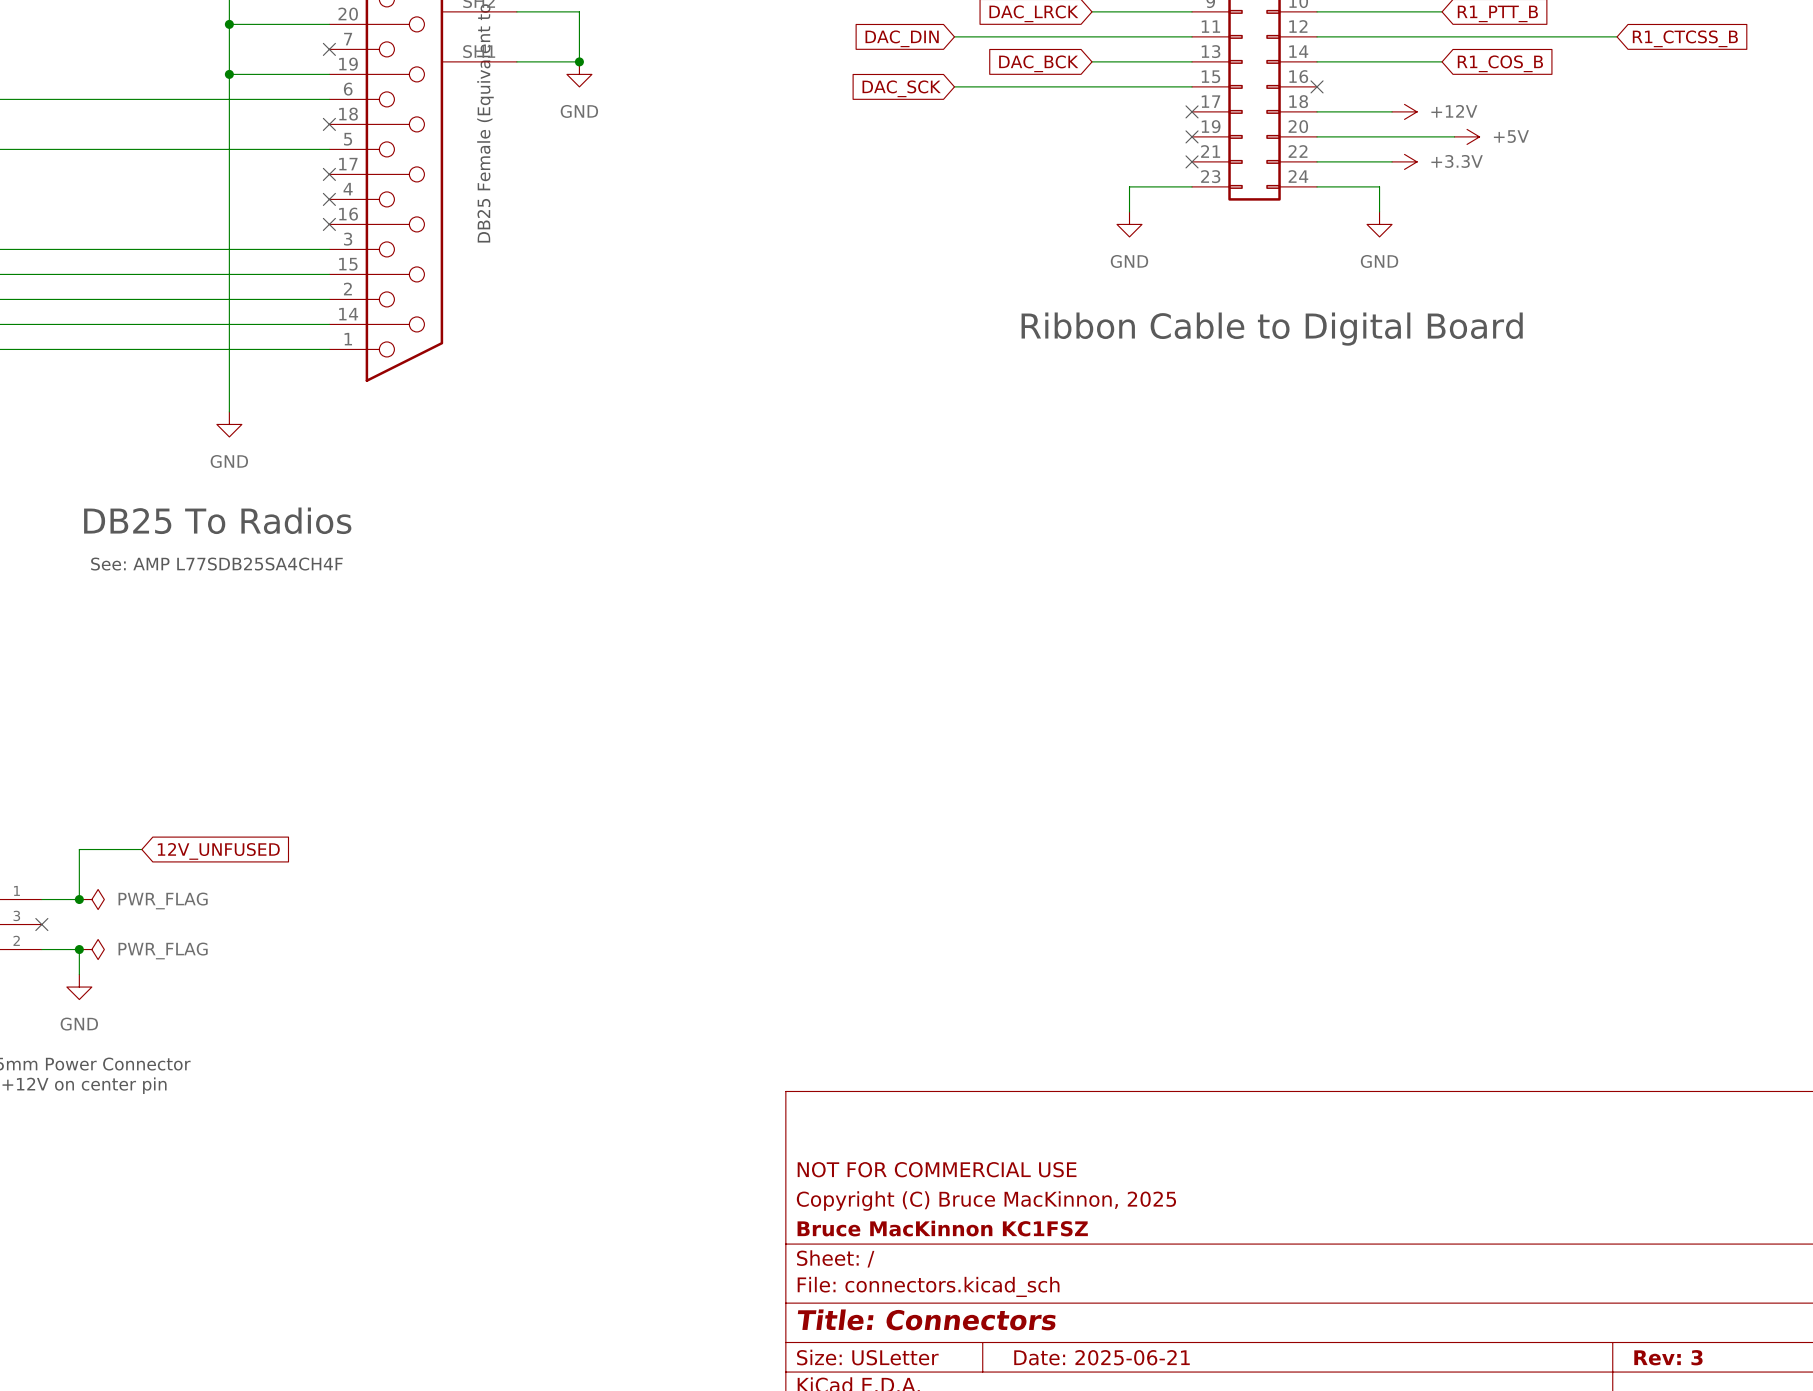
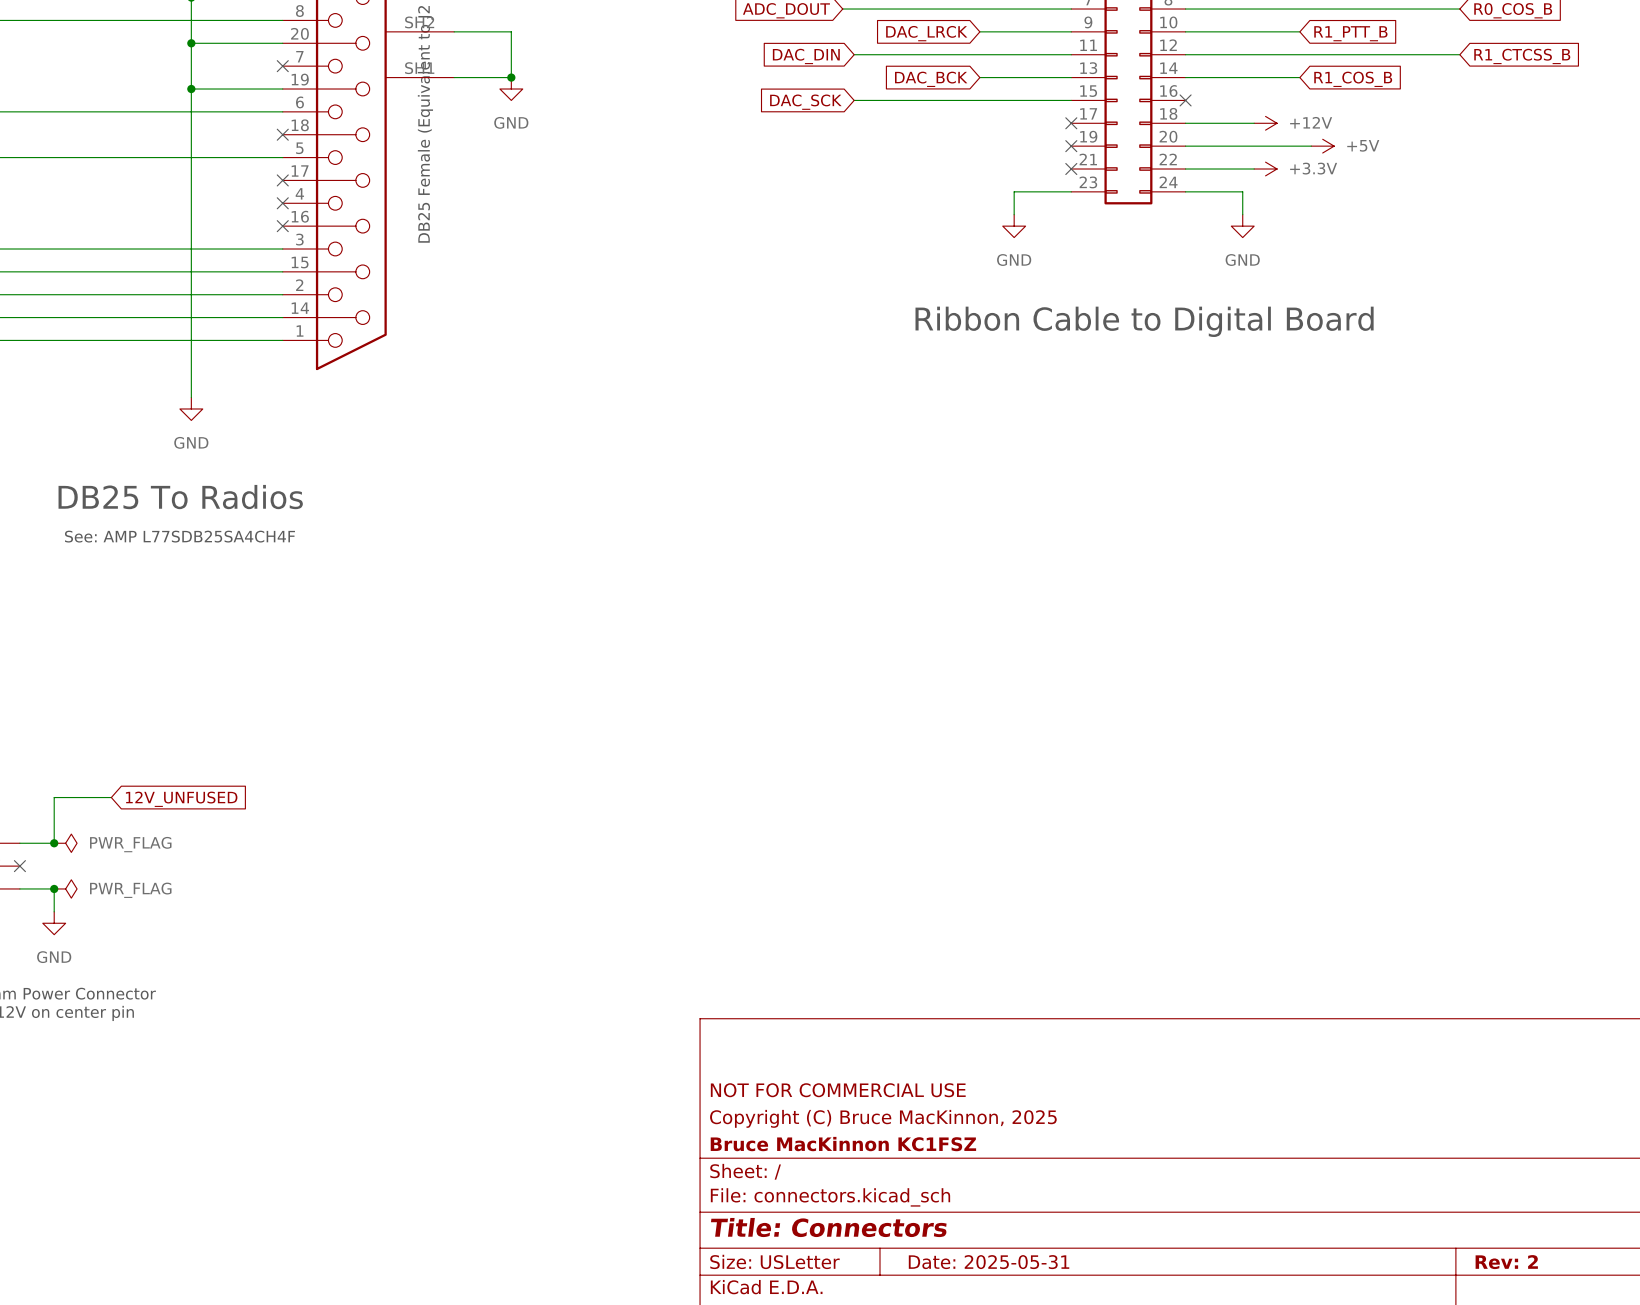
title block: Date: 2025-06-21 (1102, 1357) -> Date: 2025-05-31 (989, 1262)
title block: Rev: 3 (1668, 1357) -> Rev: 2 (1506, 1262)

